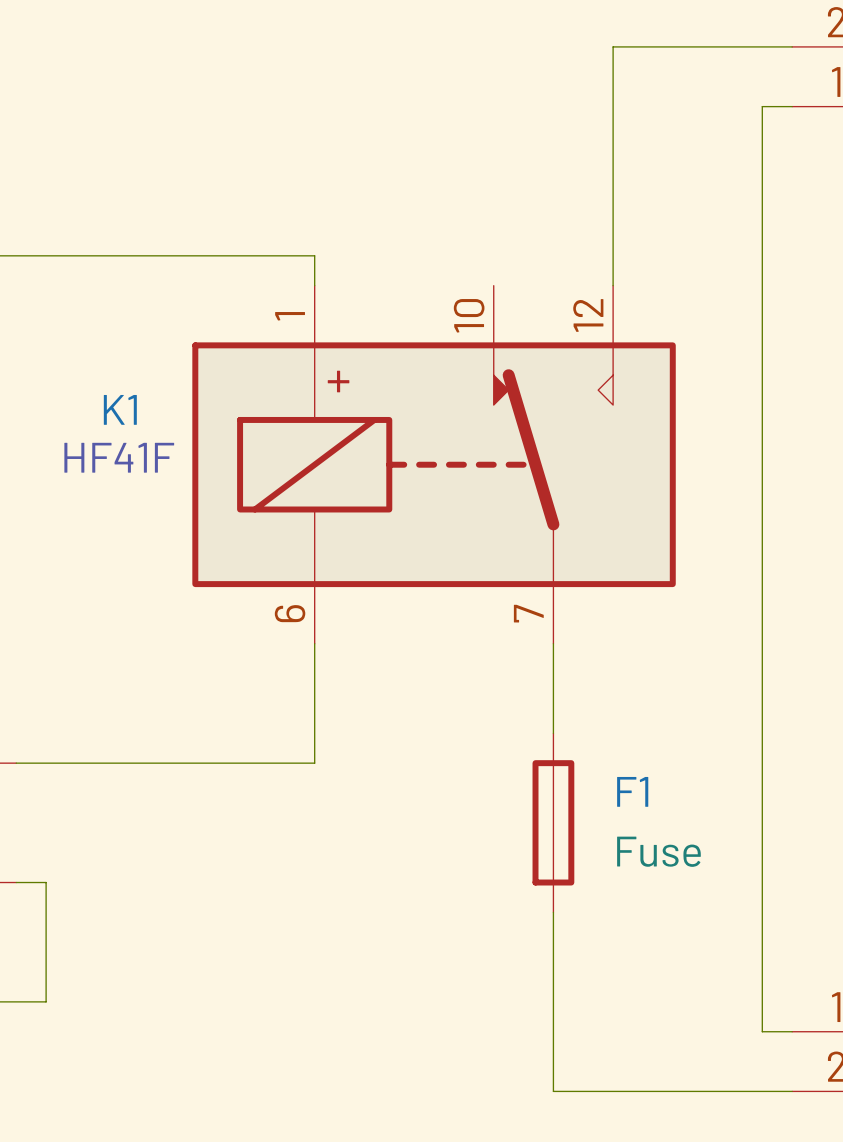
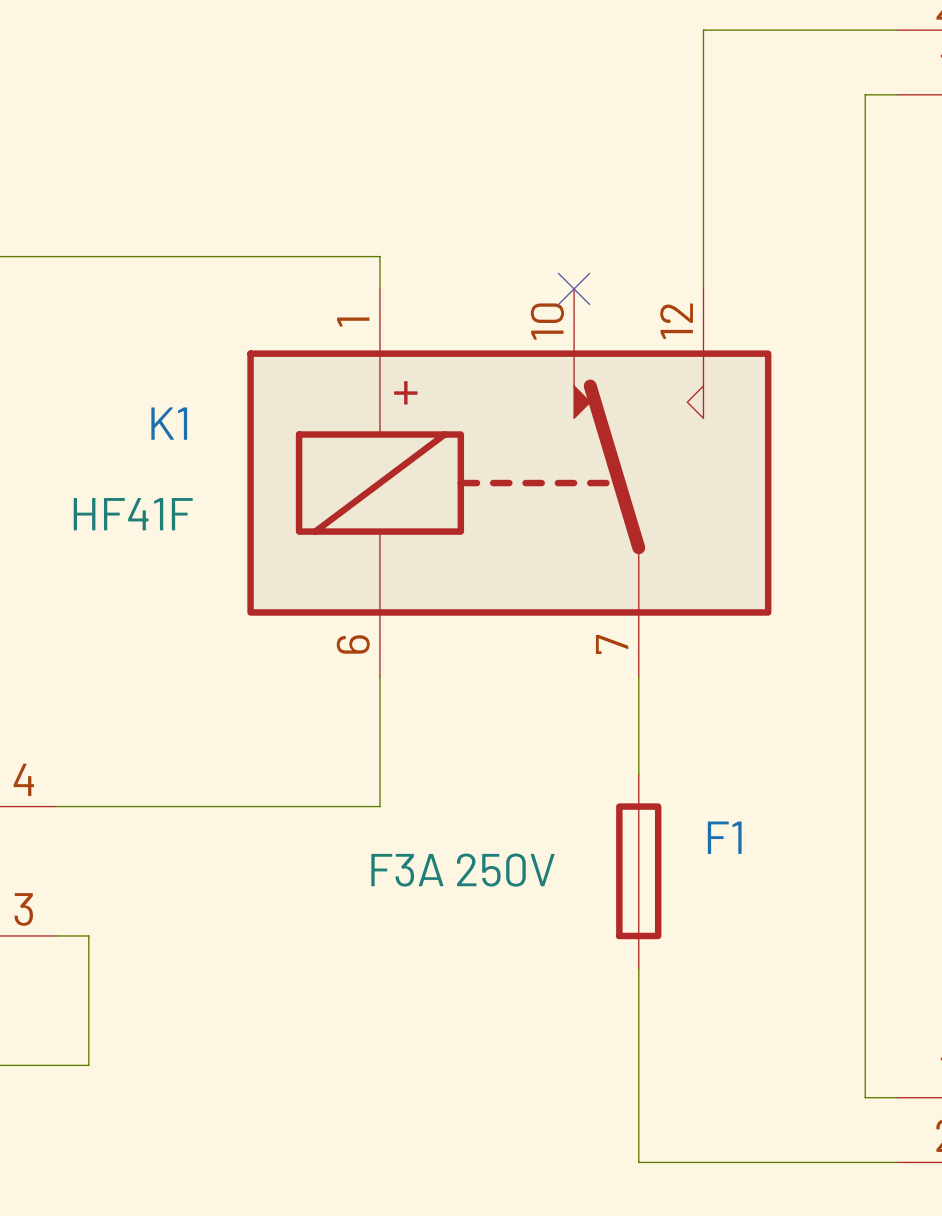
no-connect mark: none -> (574, 288)
text: HF41F (119, 457) -> none
K1 value: none -> HF41F (133, 514)
F1 value: Fuse (658, 851) -> F3A 250V (463, 870)

